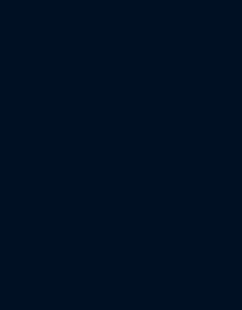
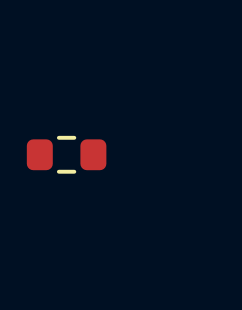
part: none -> (66, 154)

